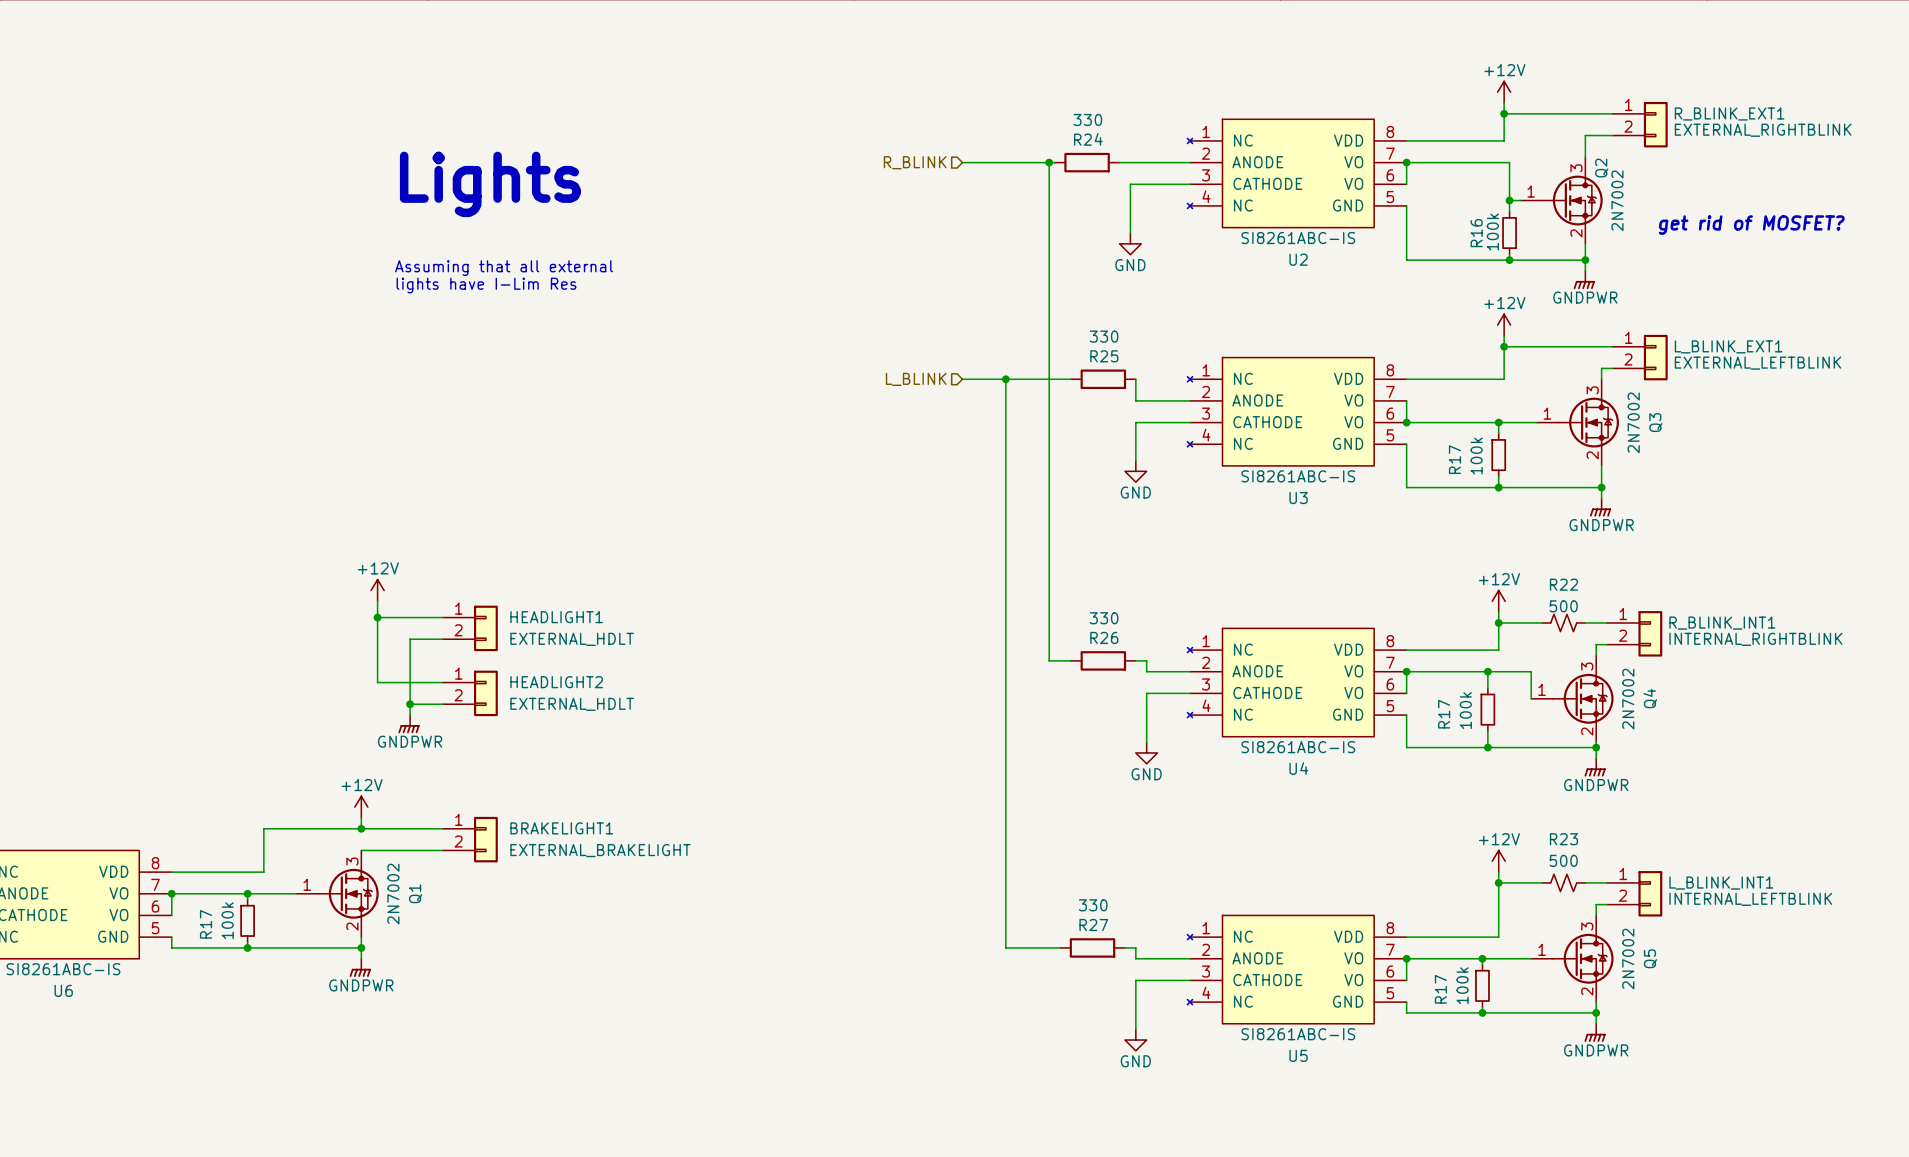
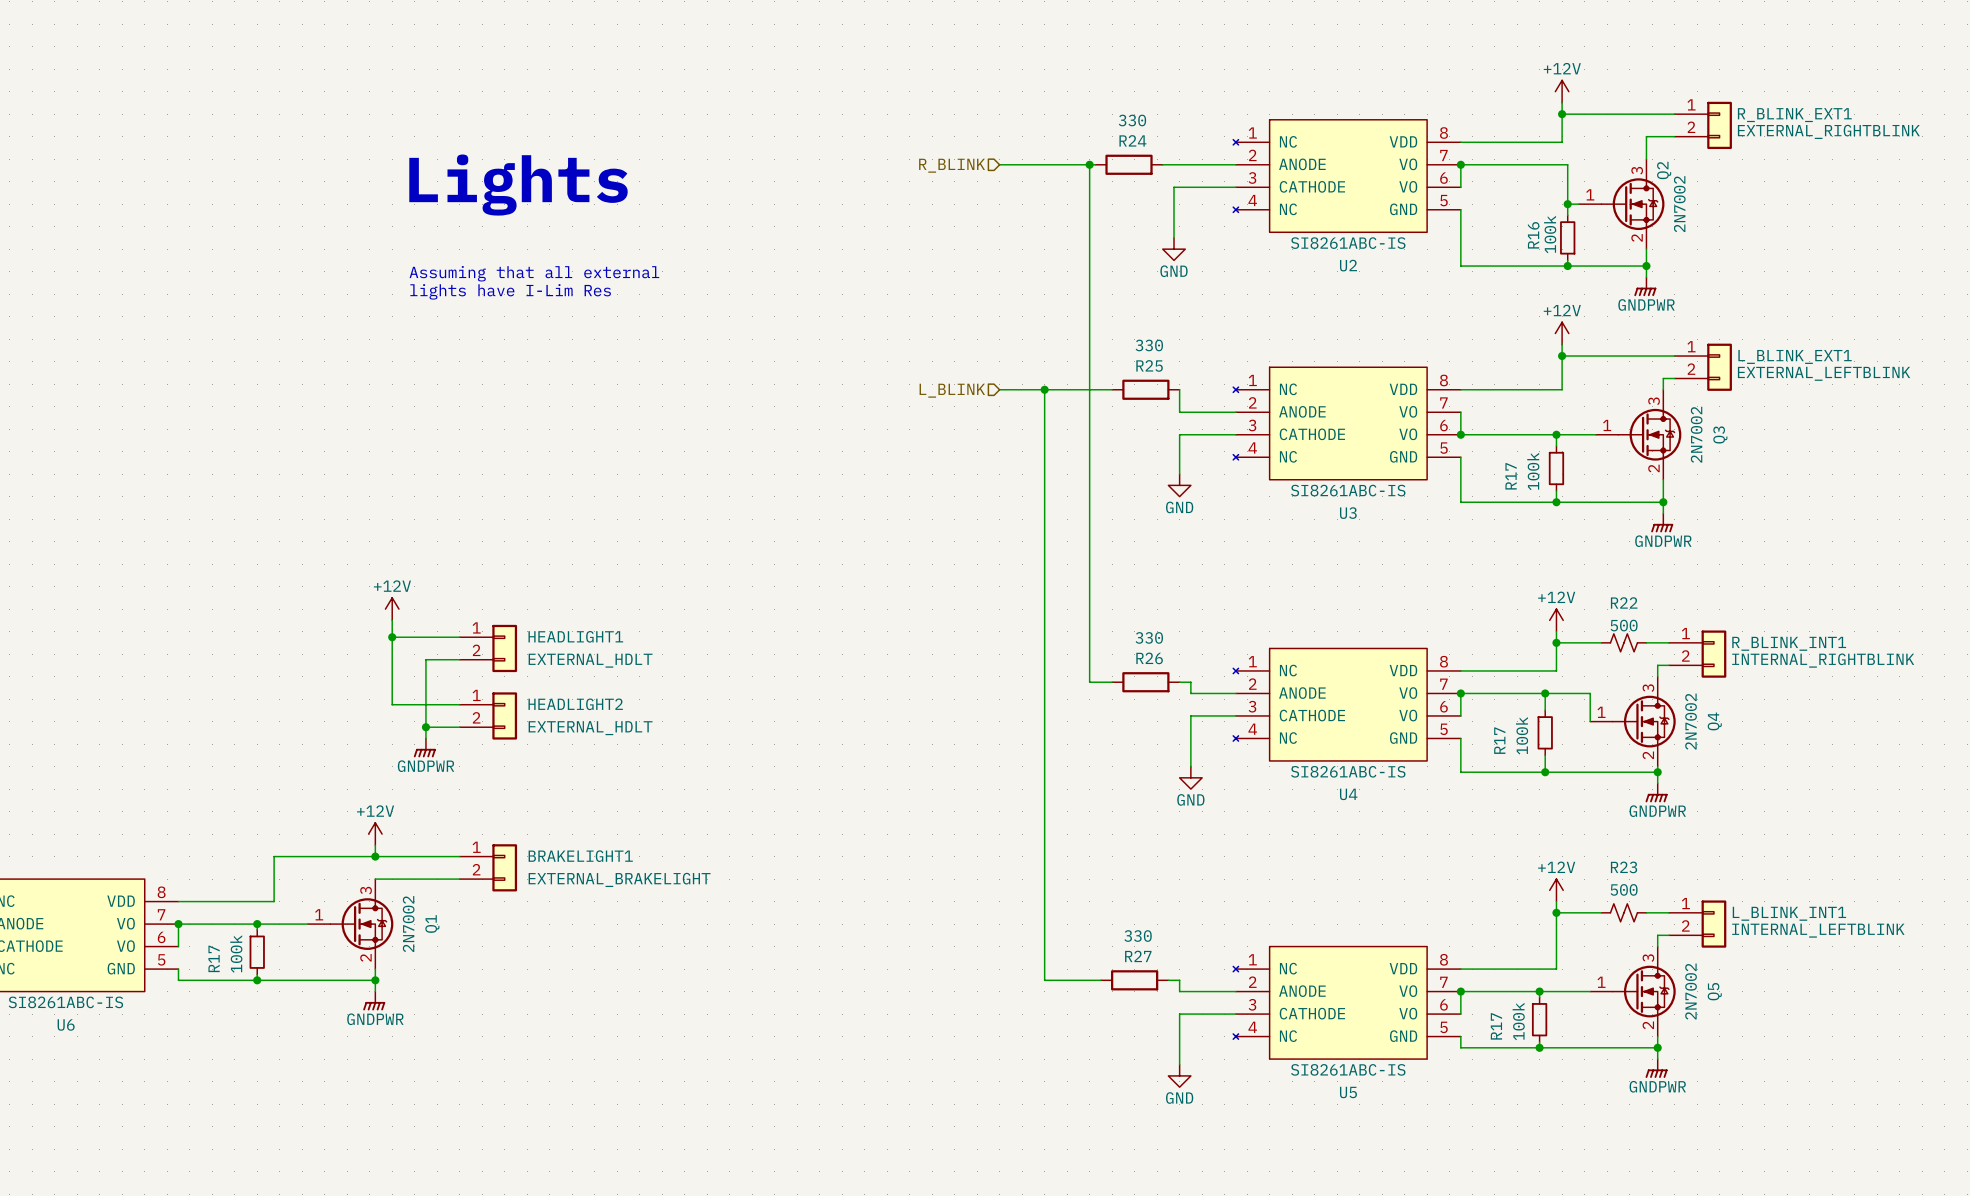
text: get rid of MOSFET? (1751, 225) -> none

